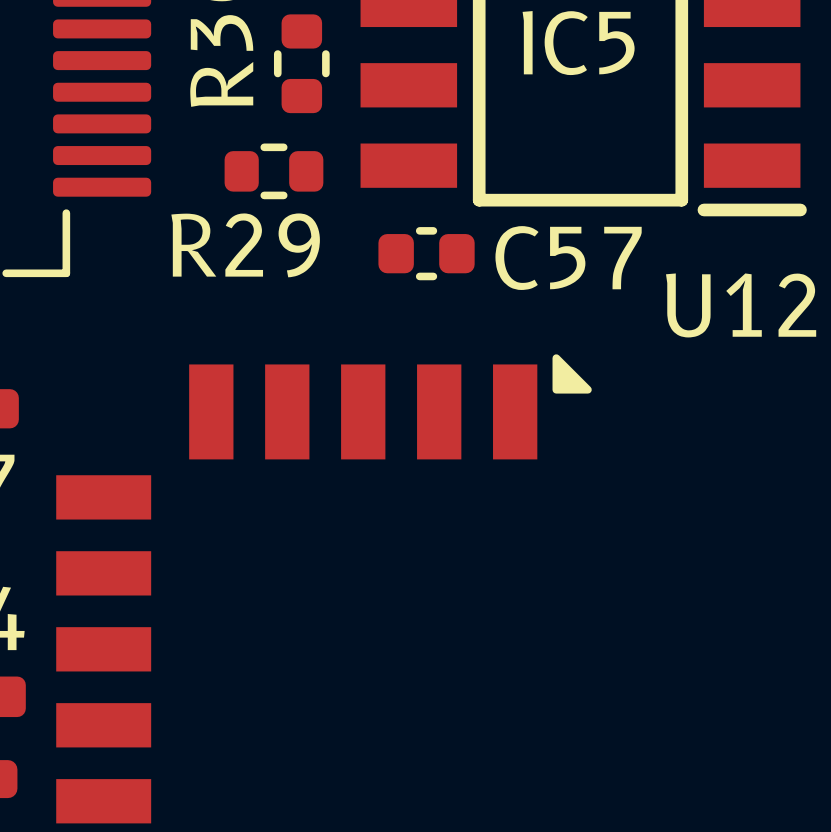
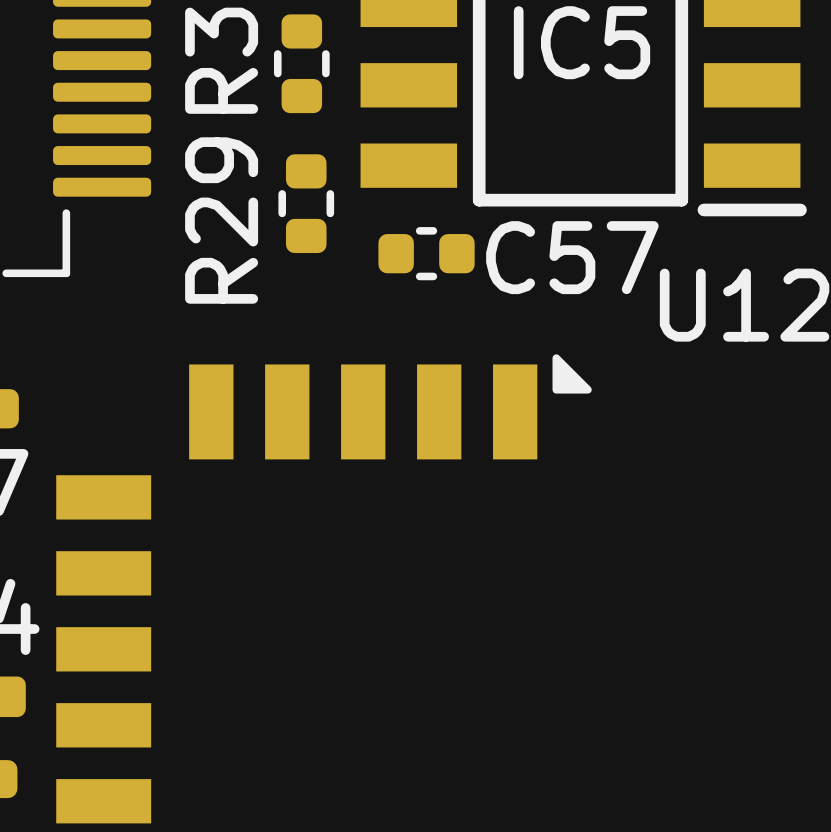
R29 rotation: 0° (273, 171) -> 90° clockwise (306, 203)

